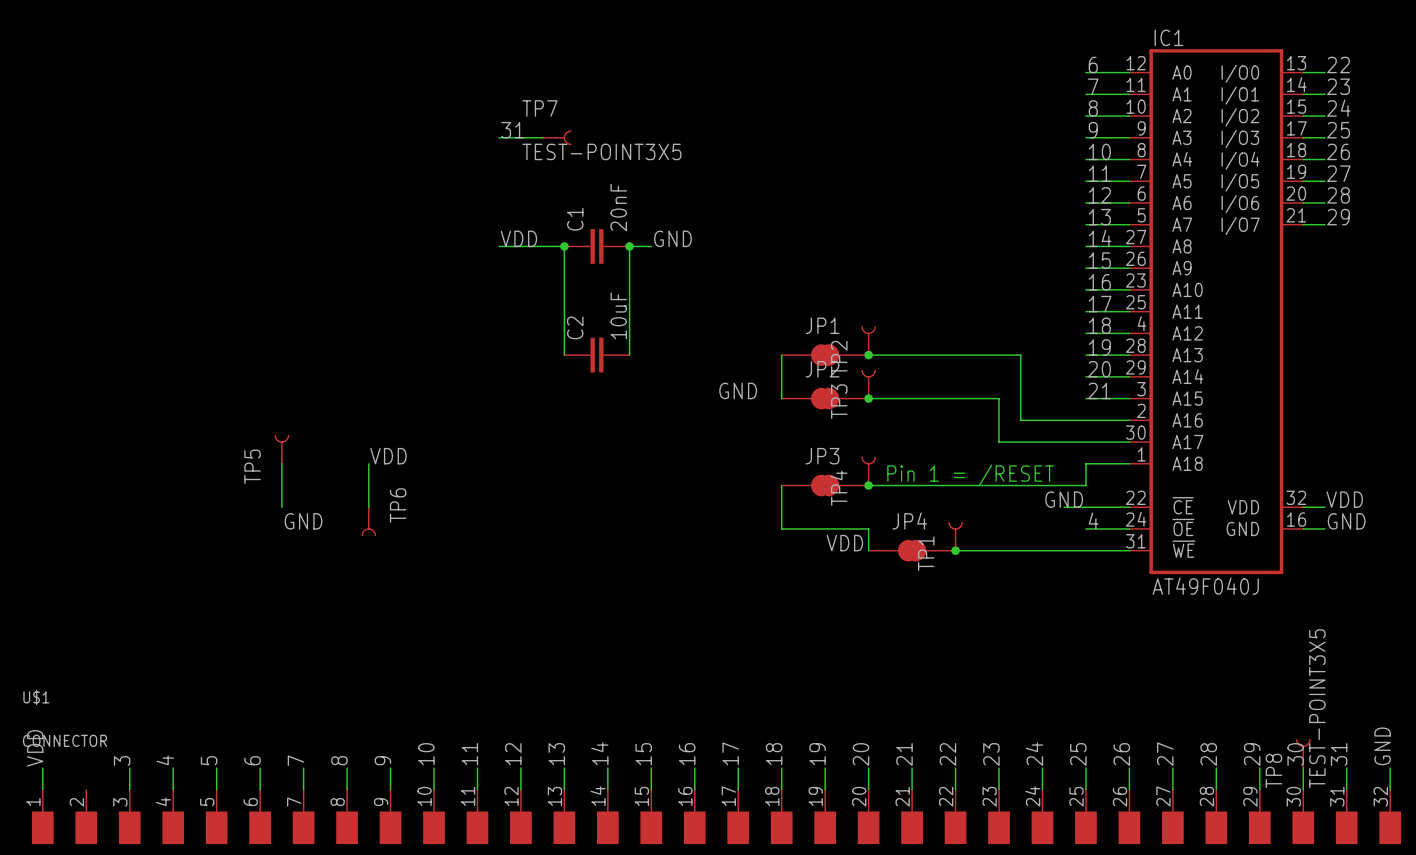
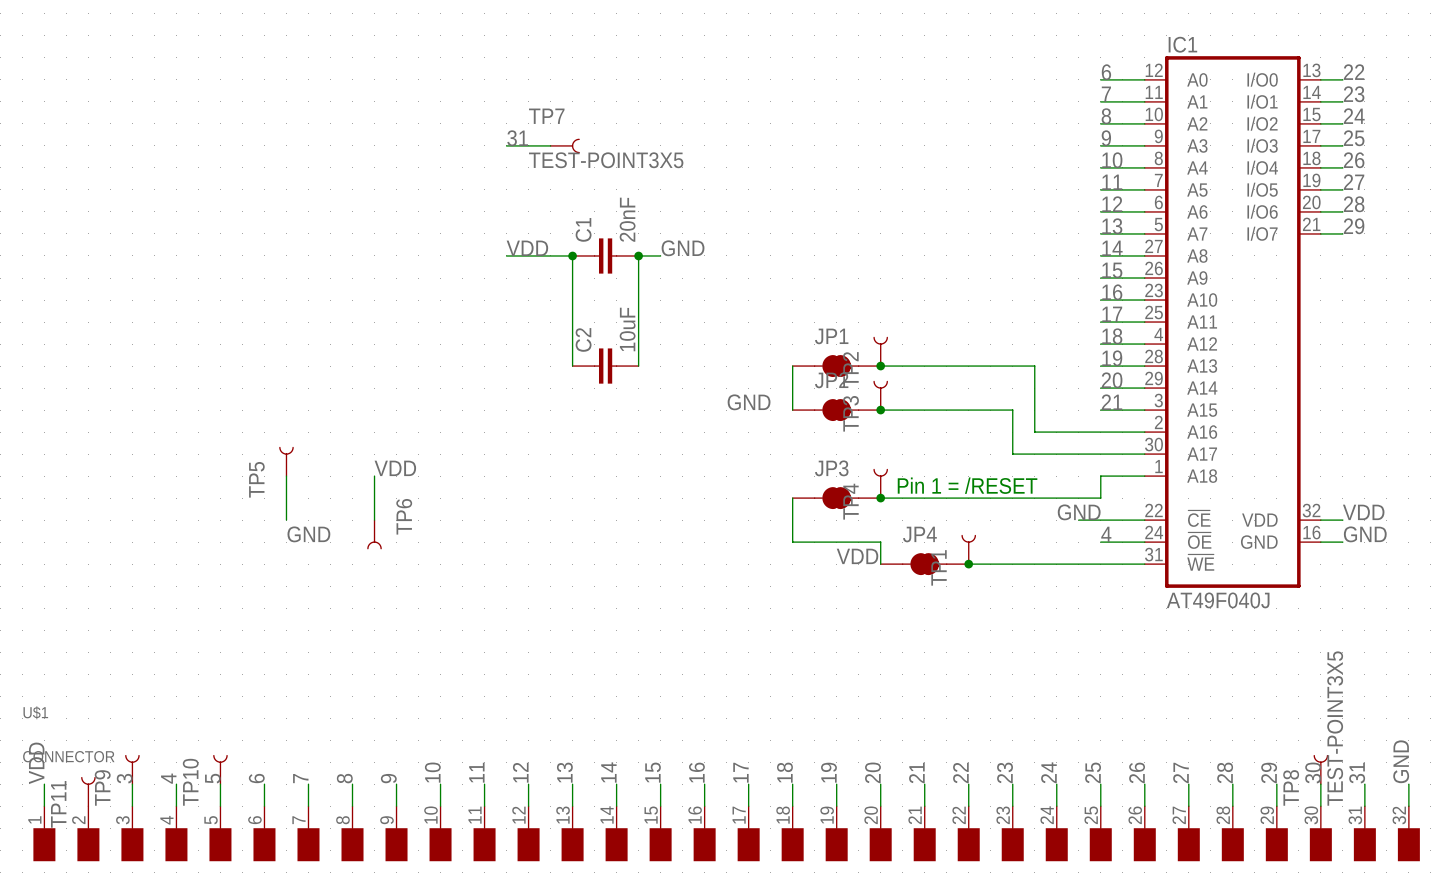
TP9: none -> (132, 769)
TP10: none -> (220, 769)
TP11: none -> (88, 791)

